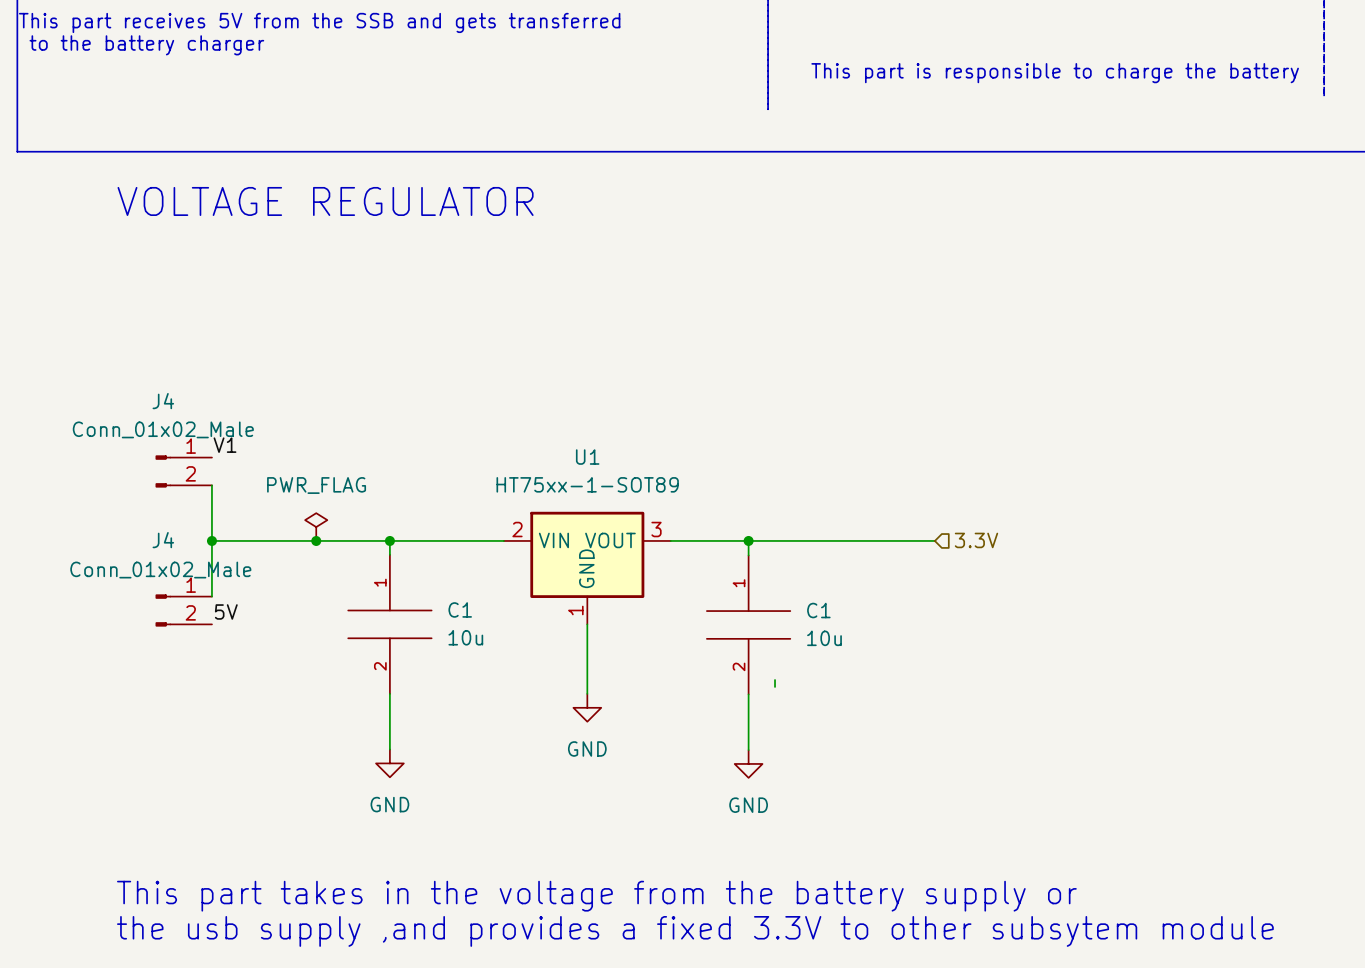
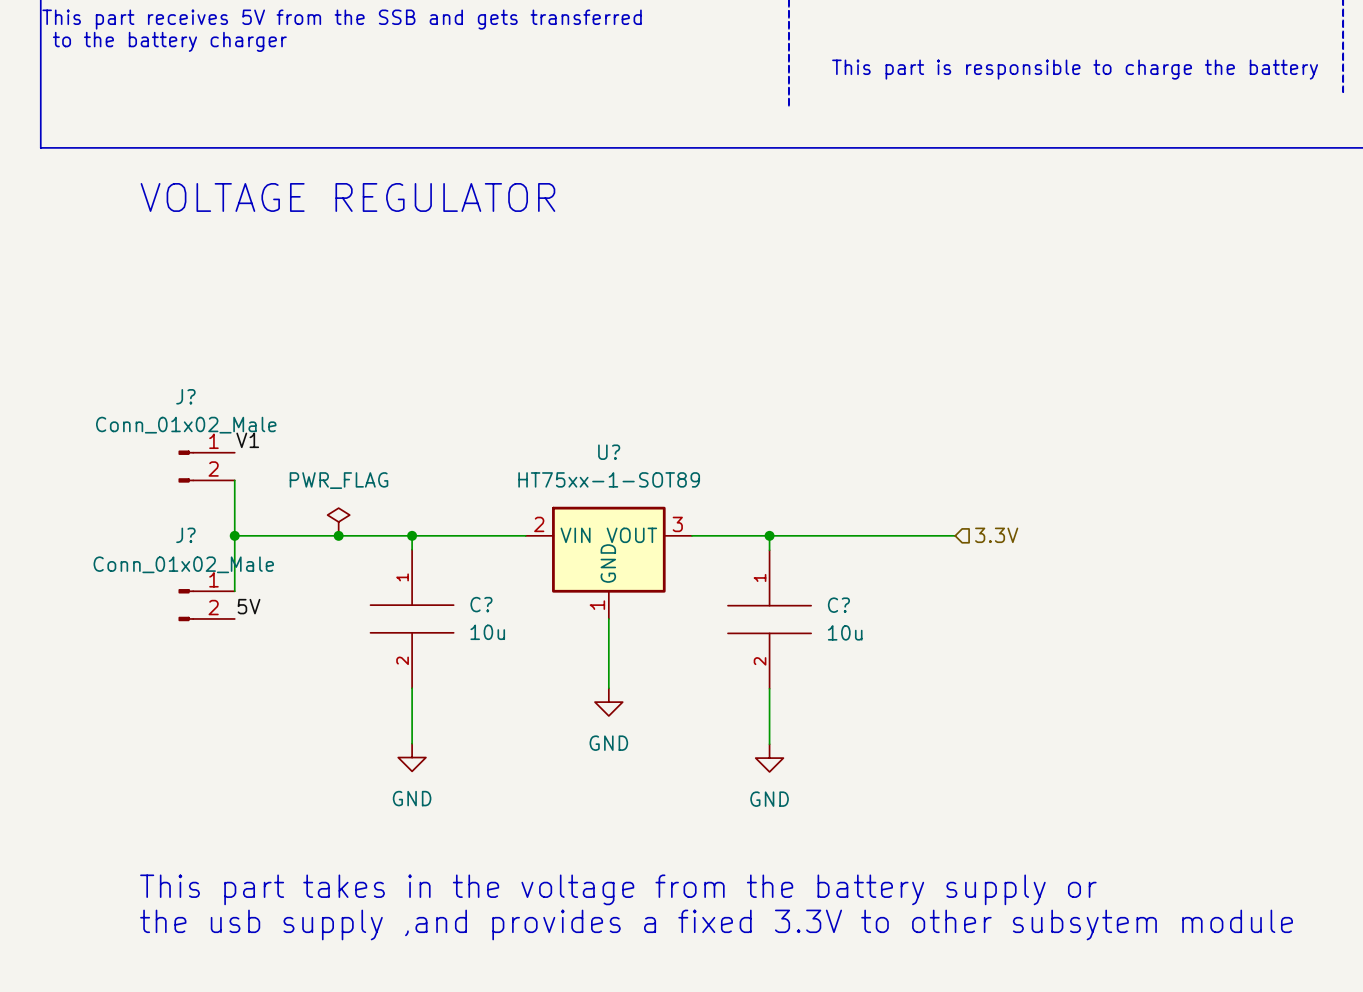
J4 name: J4 (163, 401) -> J? (185, 396)
U1 name: U1 (587, 457) -> U? (609, 452)
J4 name: J4 (163, 540) -> J? (185, 535)
C1 name: C1 (460, 609) -> C? (481, 604)
C1 name: C1 (818, 610) -> C? (838, 605)
wire: (775, 680) (775, 686) -> none

